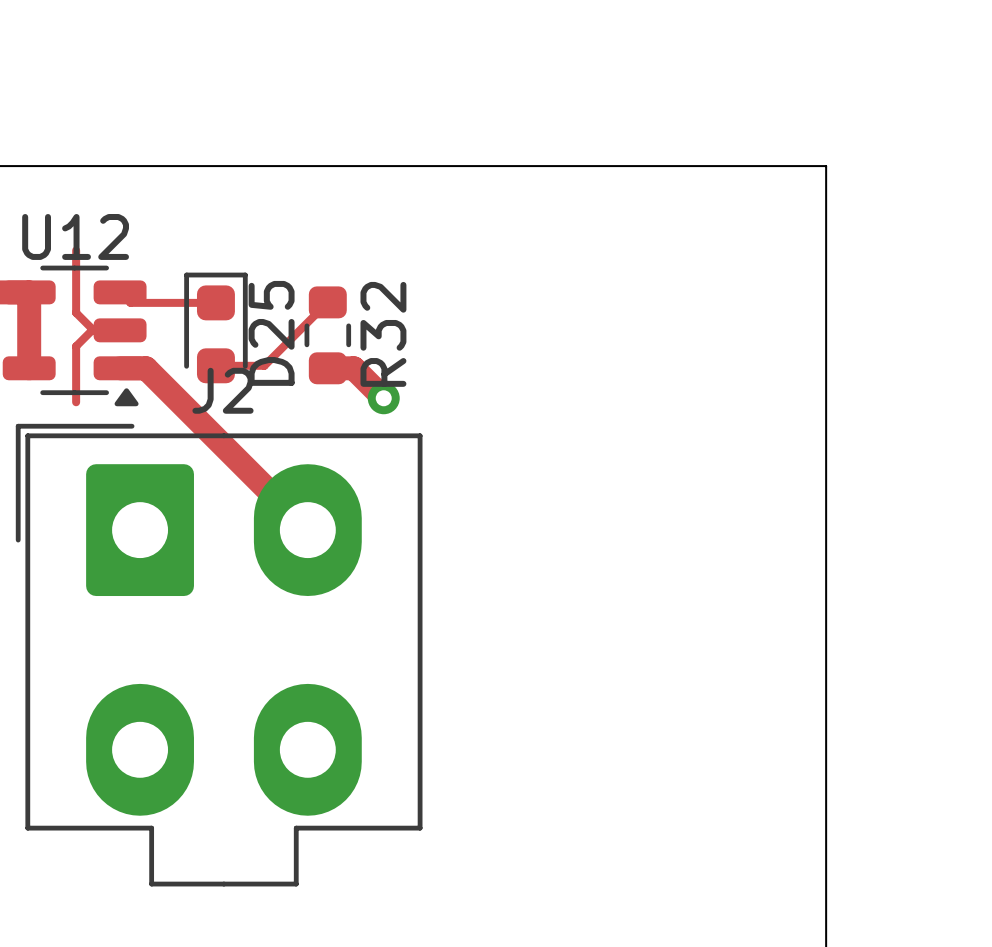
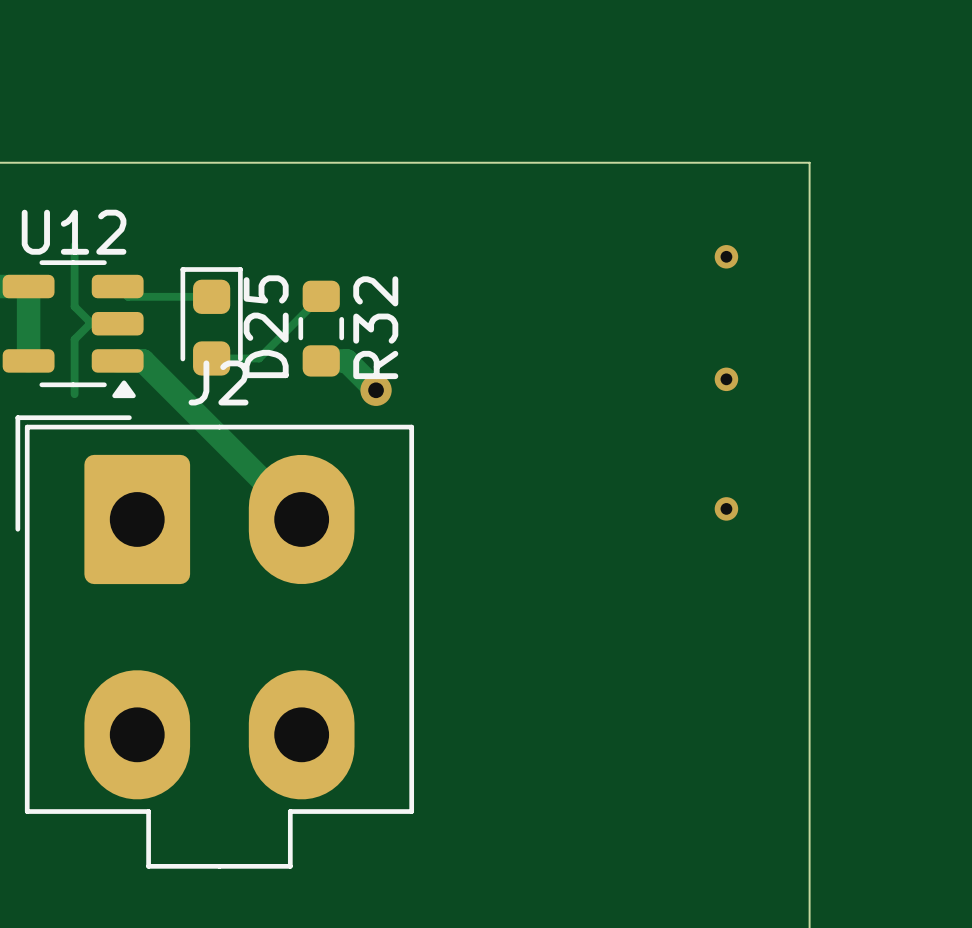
via: none -> (726, 256)
via: none -> (726, 379)
via: none -> (726, 508)

